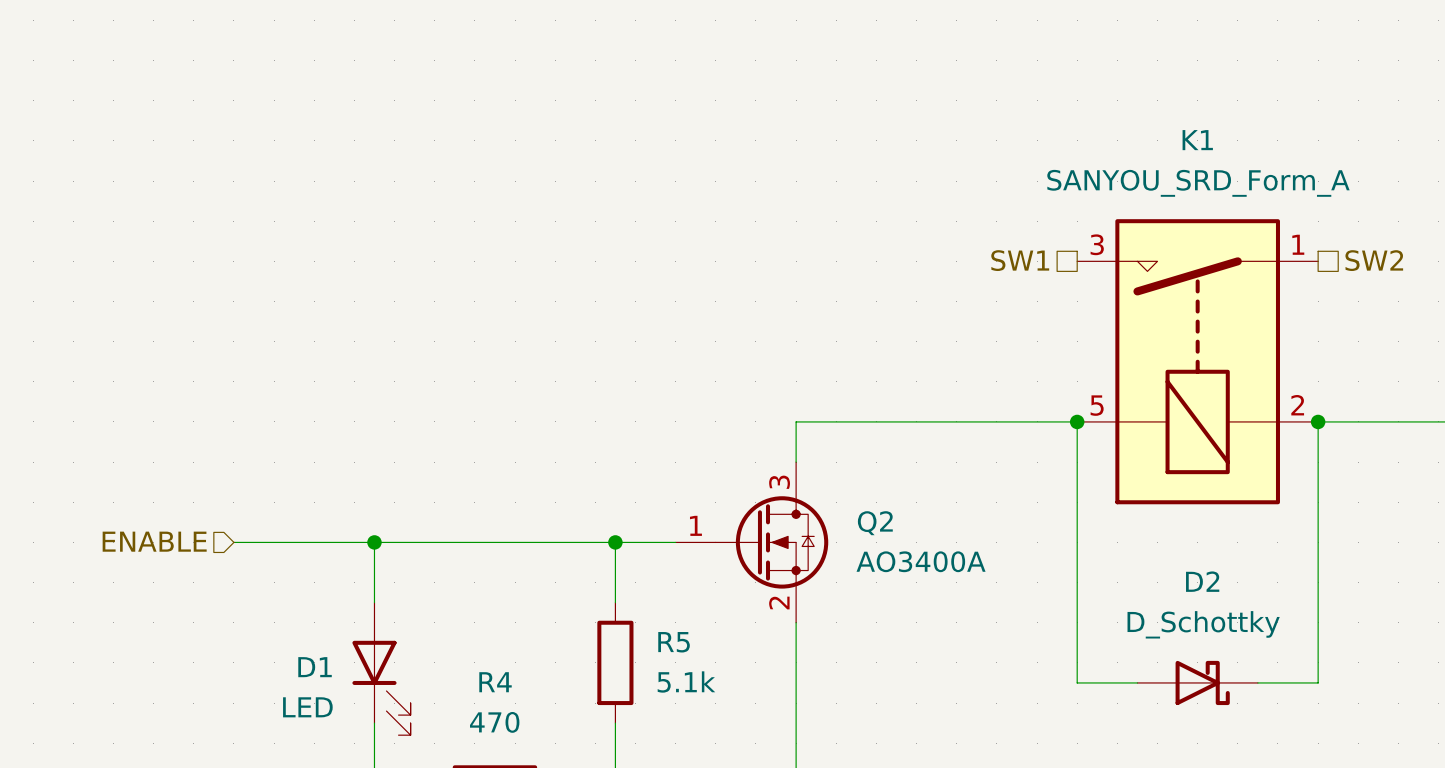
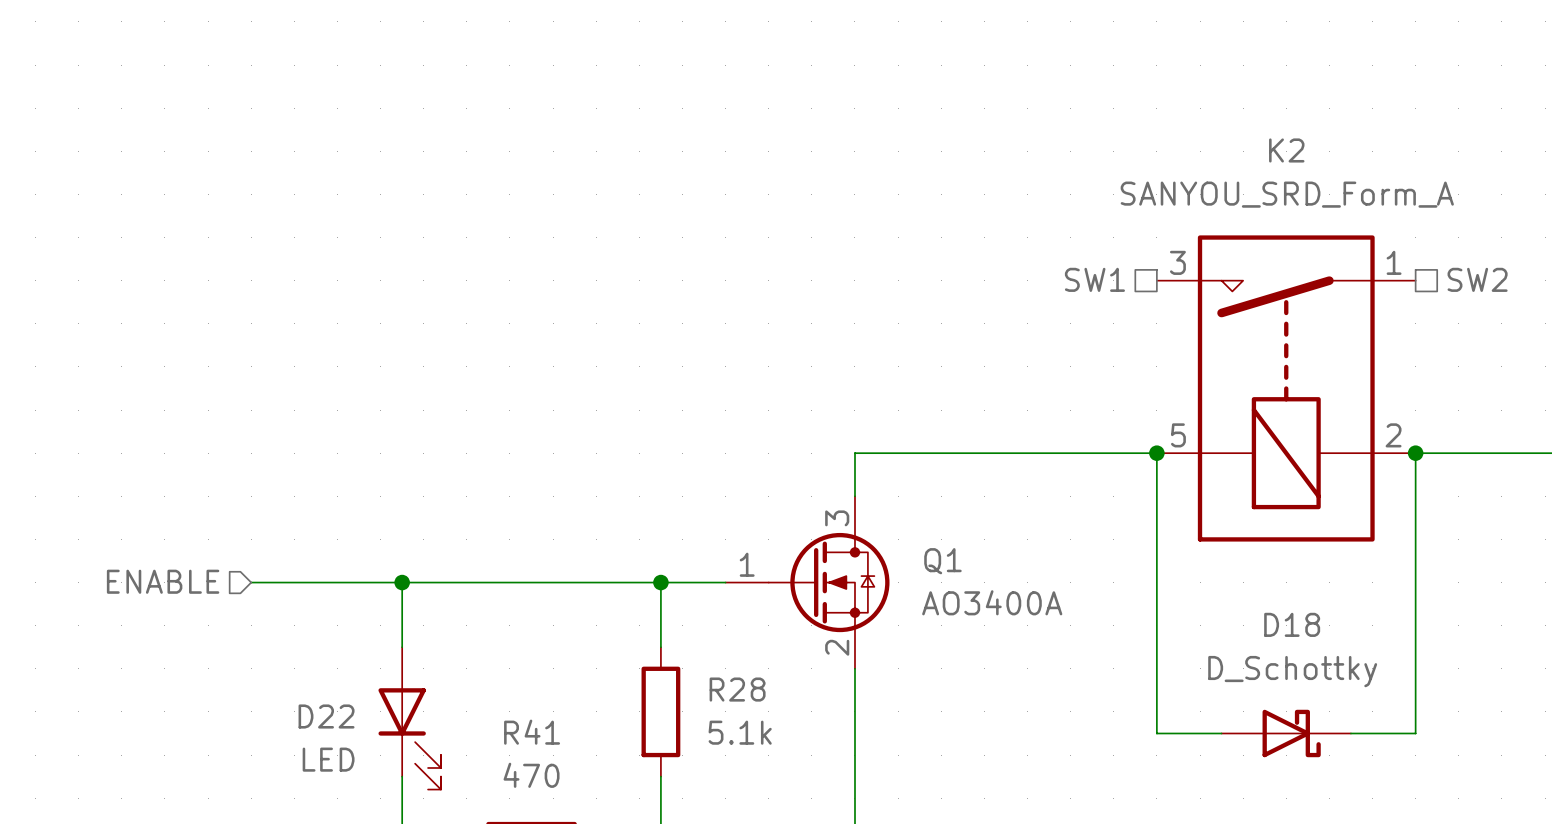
K1 name: K1 (1197, 140) -> K2 (1286, 150)
Q2 name: Q2 (875, 523) -> Q1 (942, 561)
D2 name: D2 (1202, 581) -> D18 (1292, 624)
R5 name: R5 (674, 642) -> R28 (737, 689)
D1 name: D1 (315, 667) -> D22 (326, 716)
R4 name: R4 (495, 682) -> R41 (532, 732)

